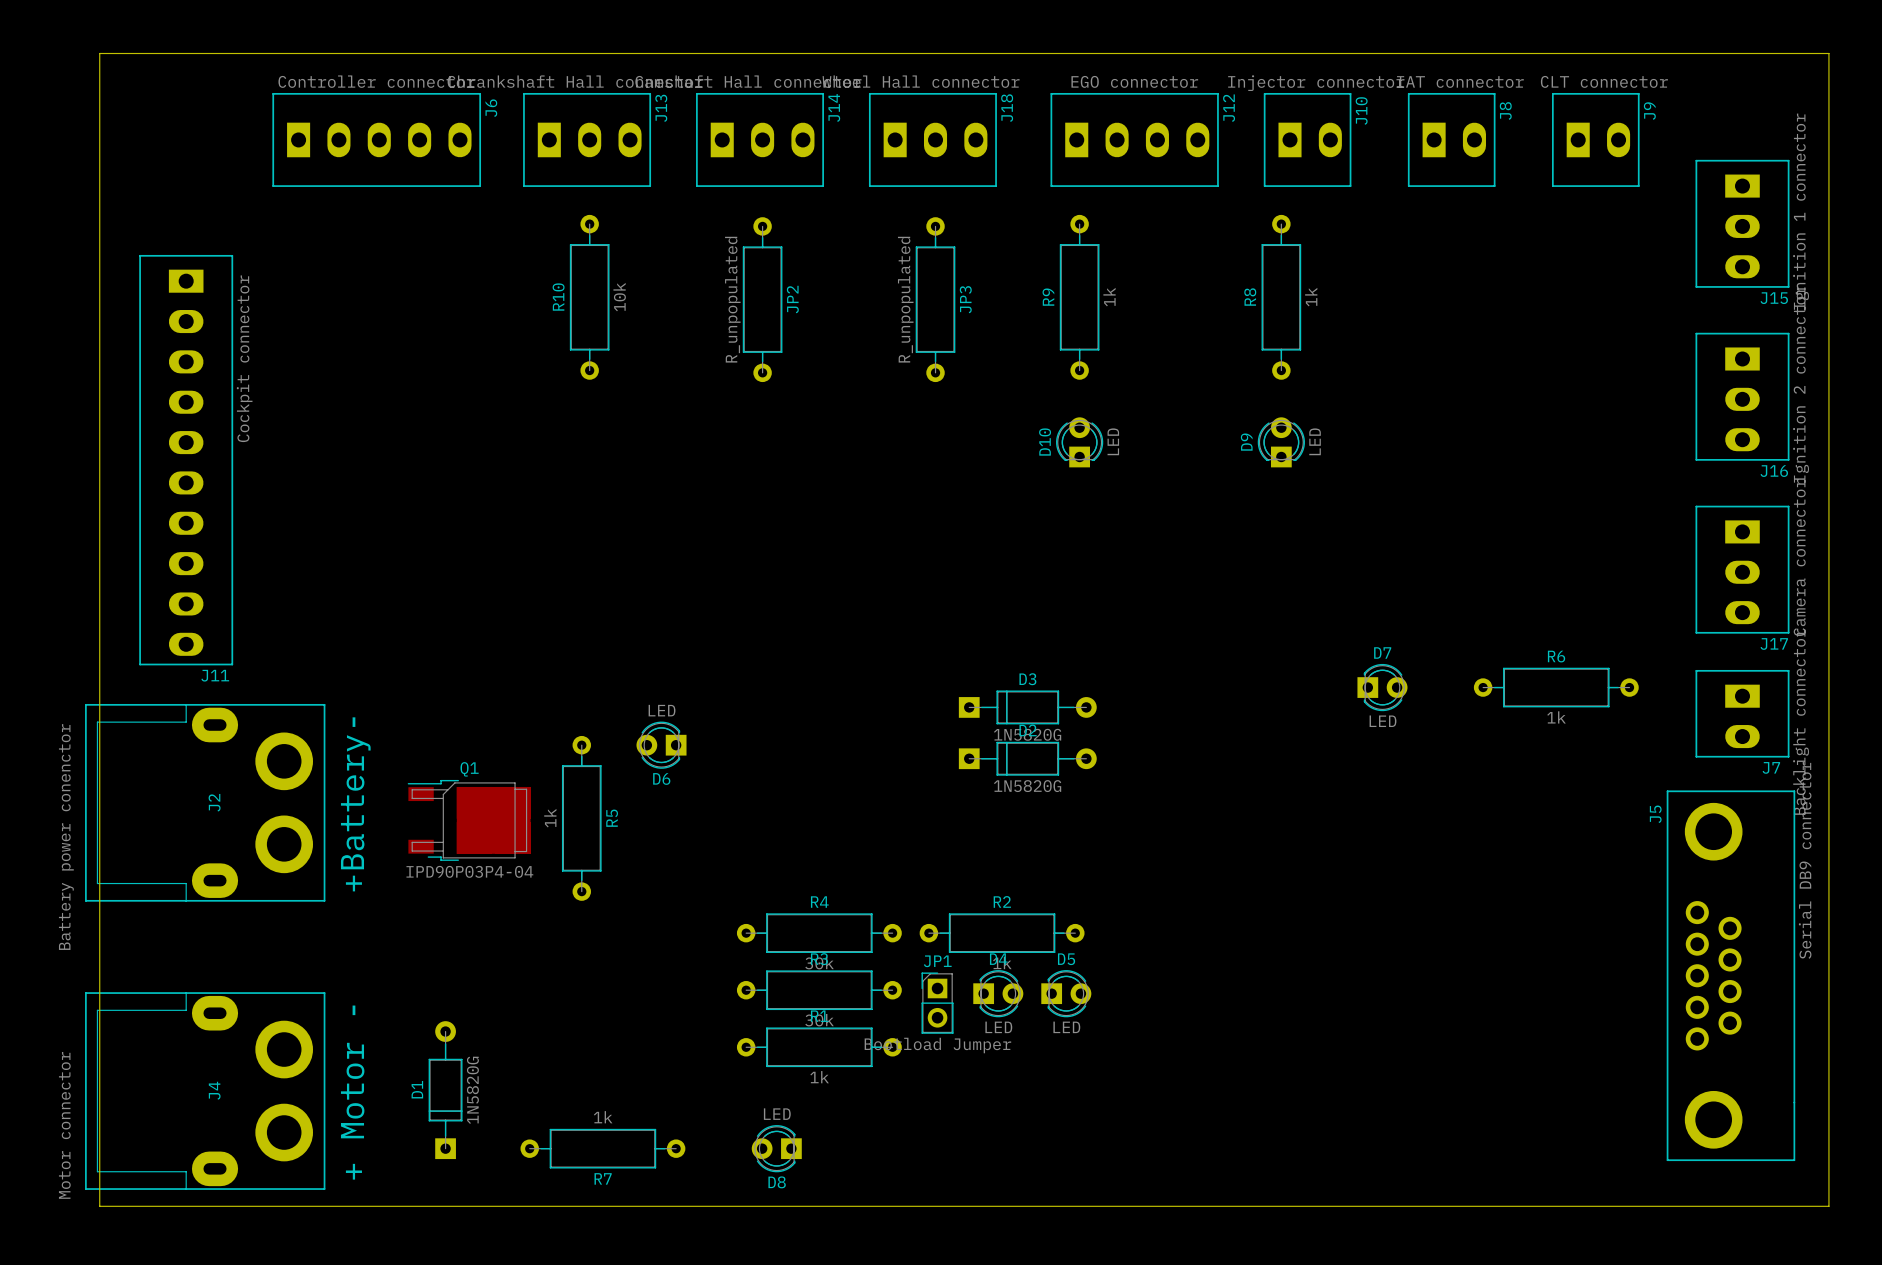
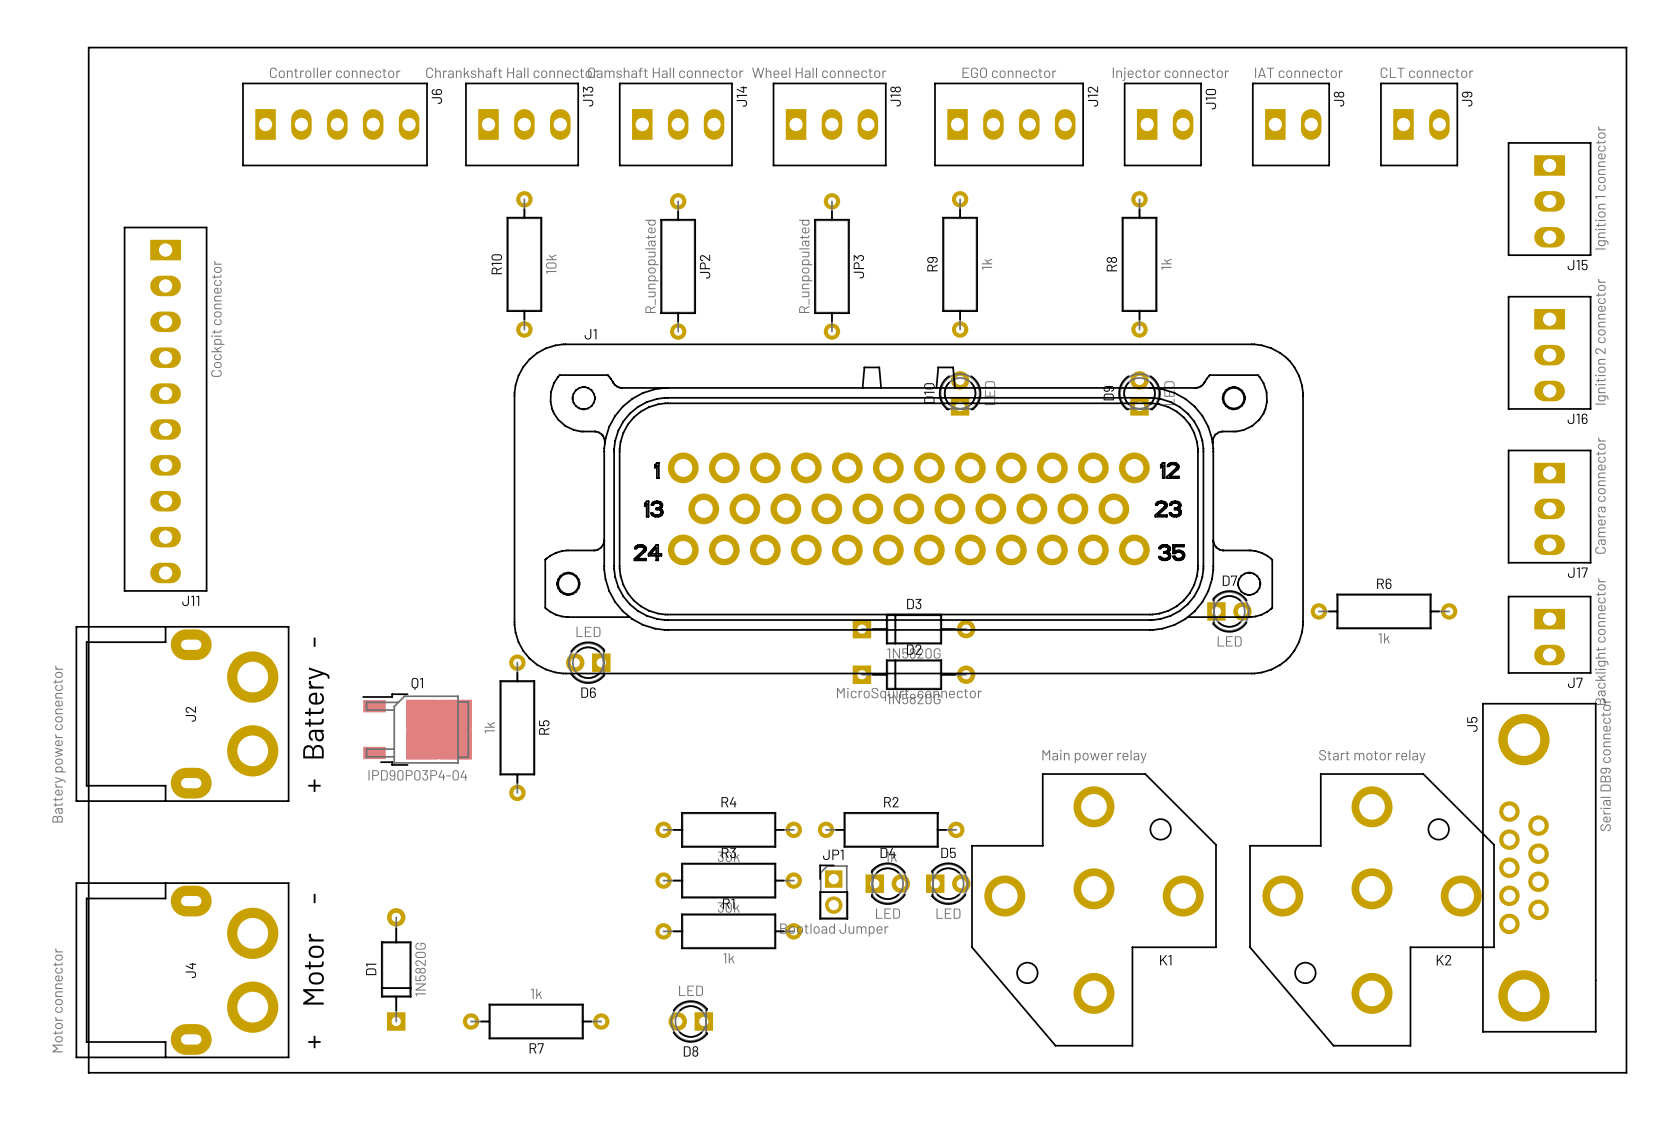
J1: none -> MicroSquirt_connector (908, 508)
K1: none -> Main power relay (1093, 909)
K2: none -> Start motor relay (1372, 909)

